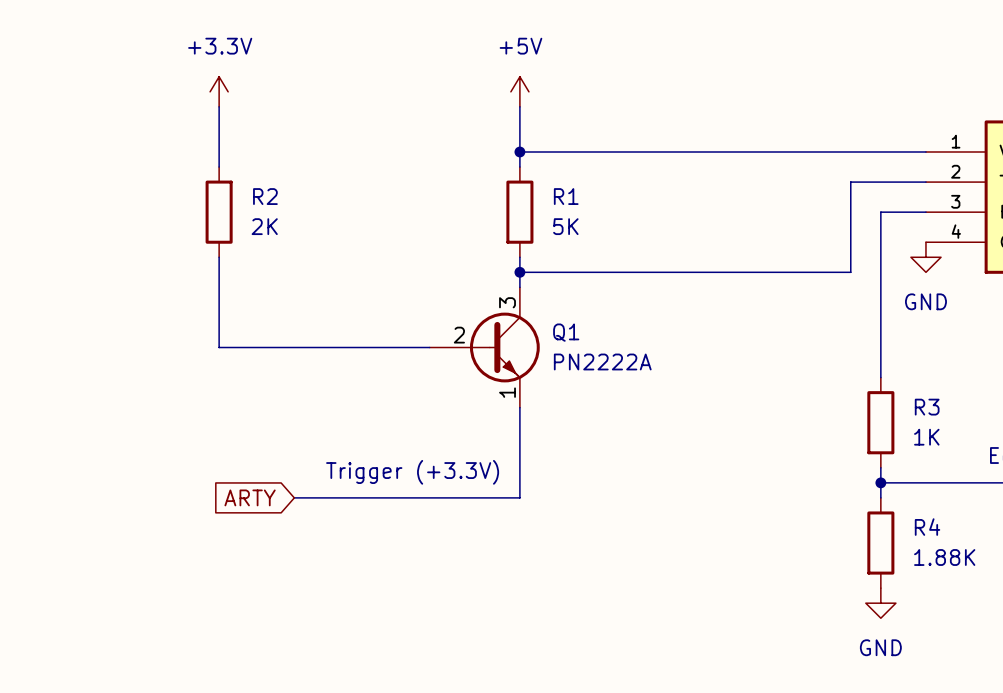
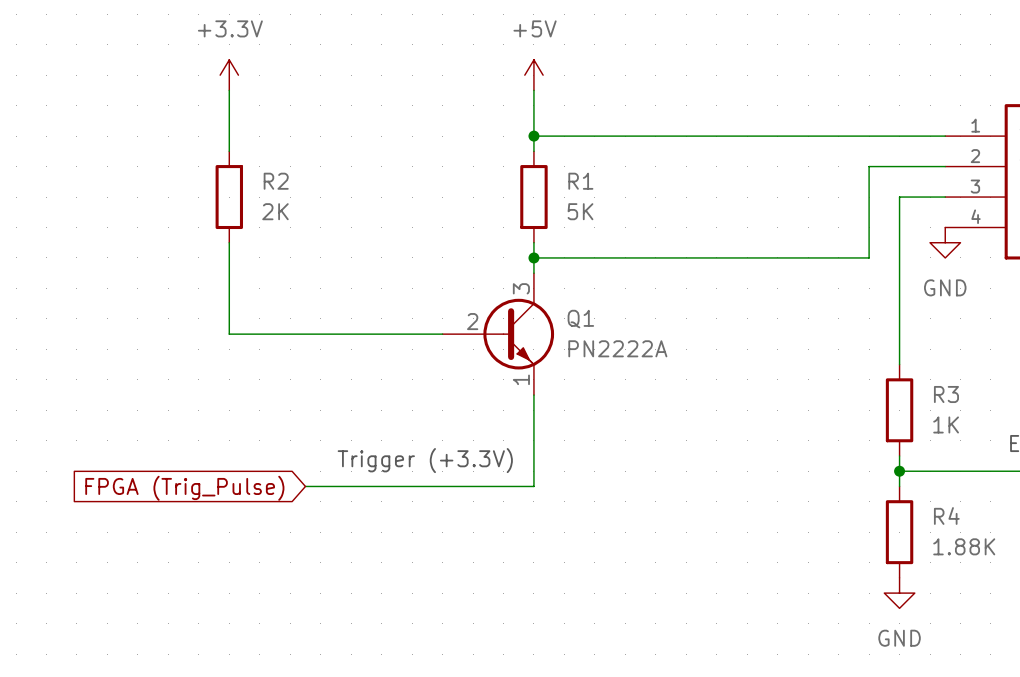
global label: ARTY (250, 497) -> FPGA (Trig_Pulse) (184, 488)

